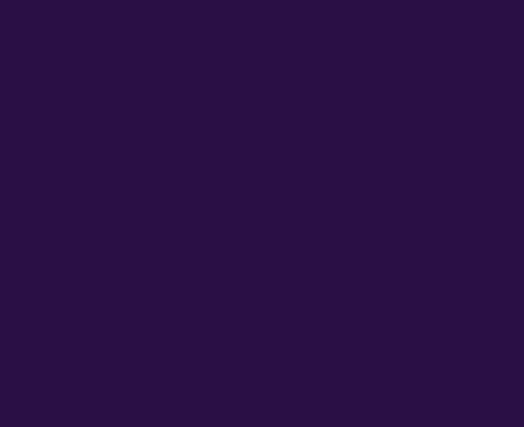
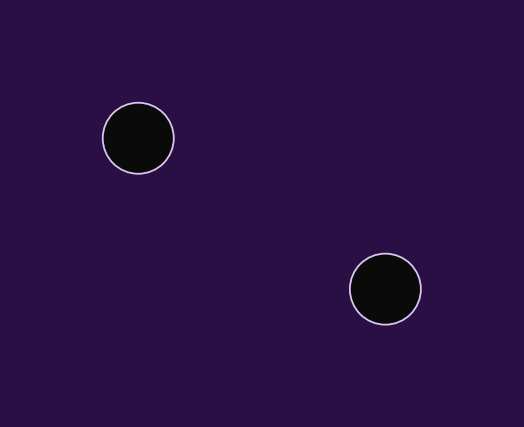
part: none -> (138, 138)
part: none -> (385, 289)

